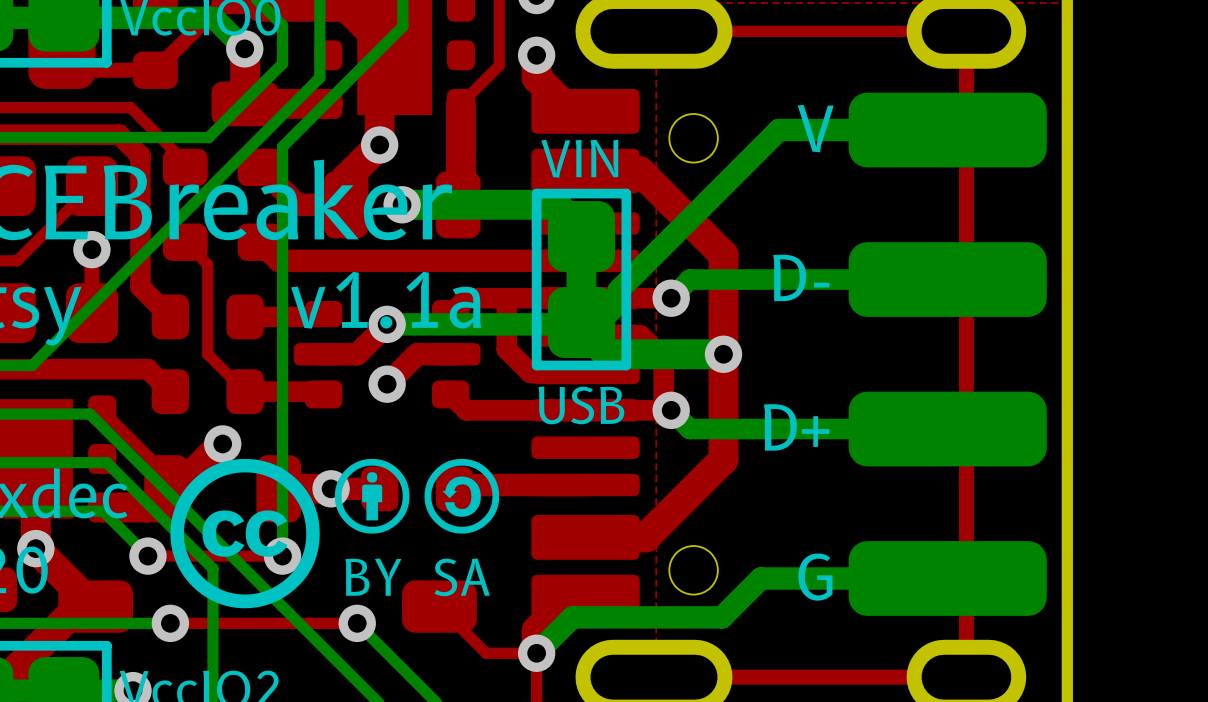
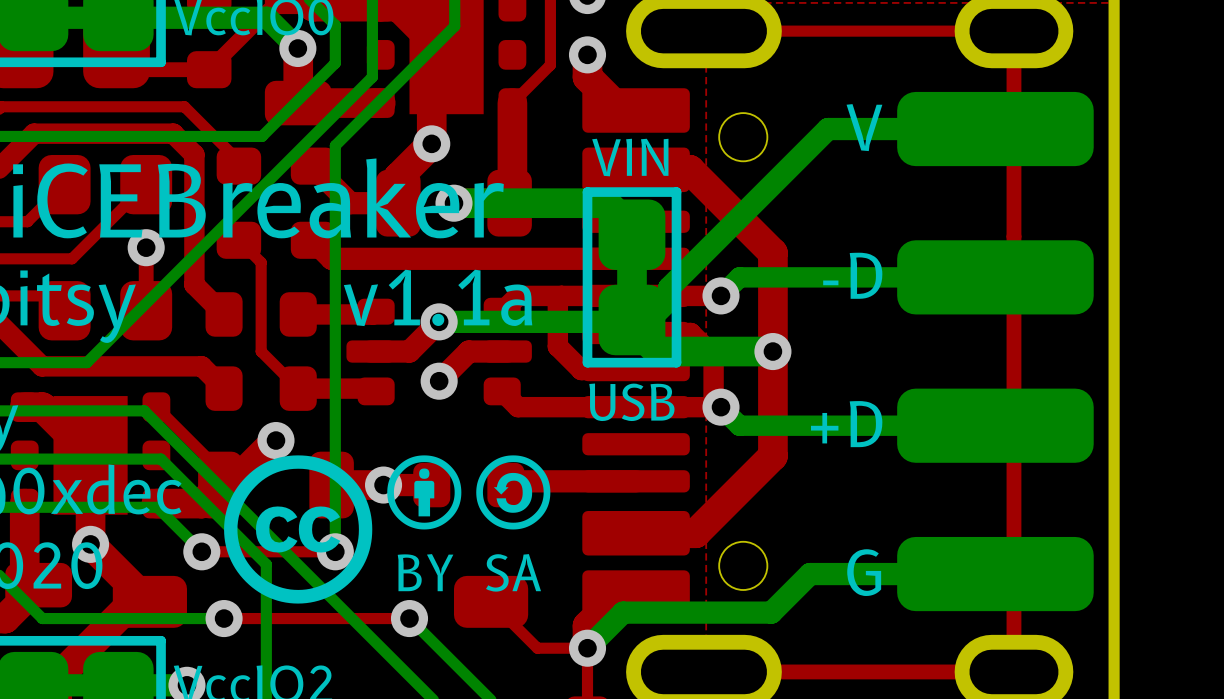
text: D- (801, 277) -> -D (852, 275)
text: D+ (796, 427) -> +D (846, 424)

